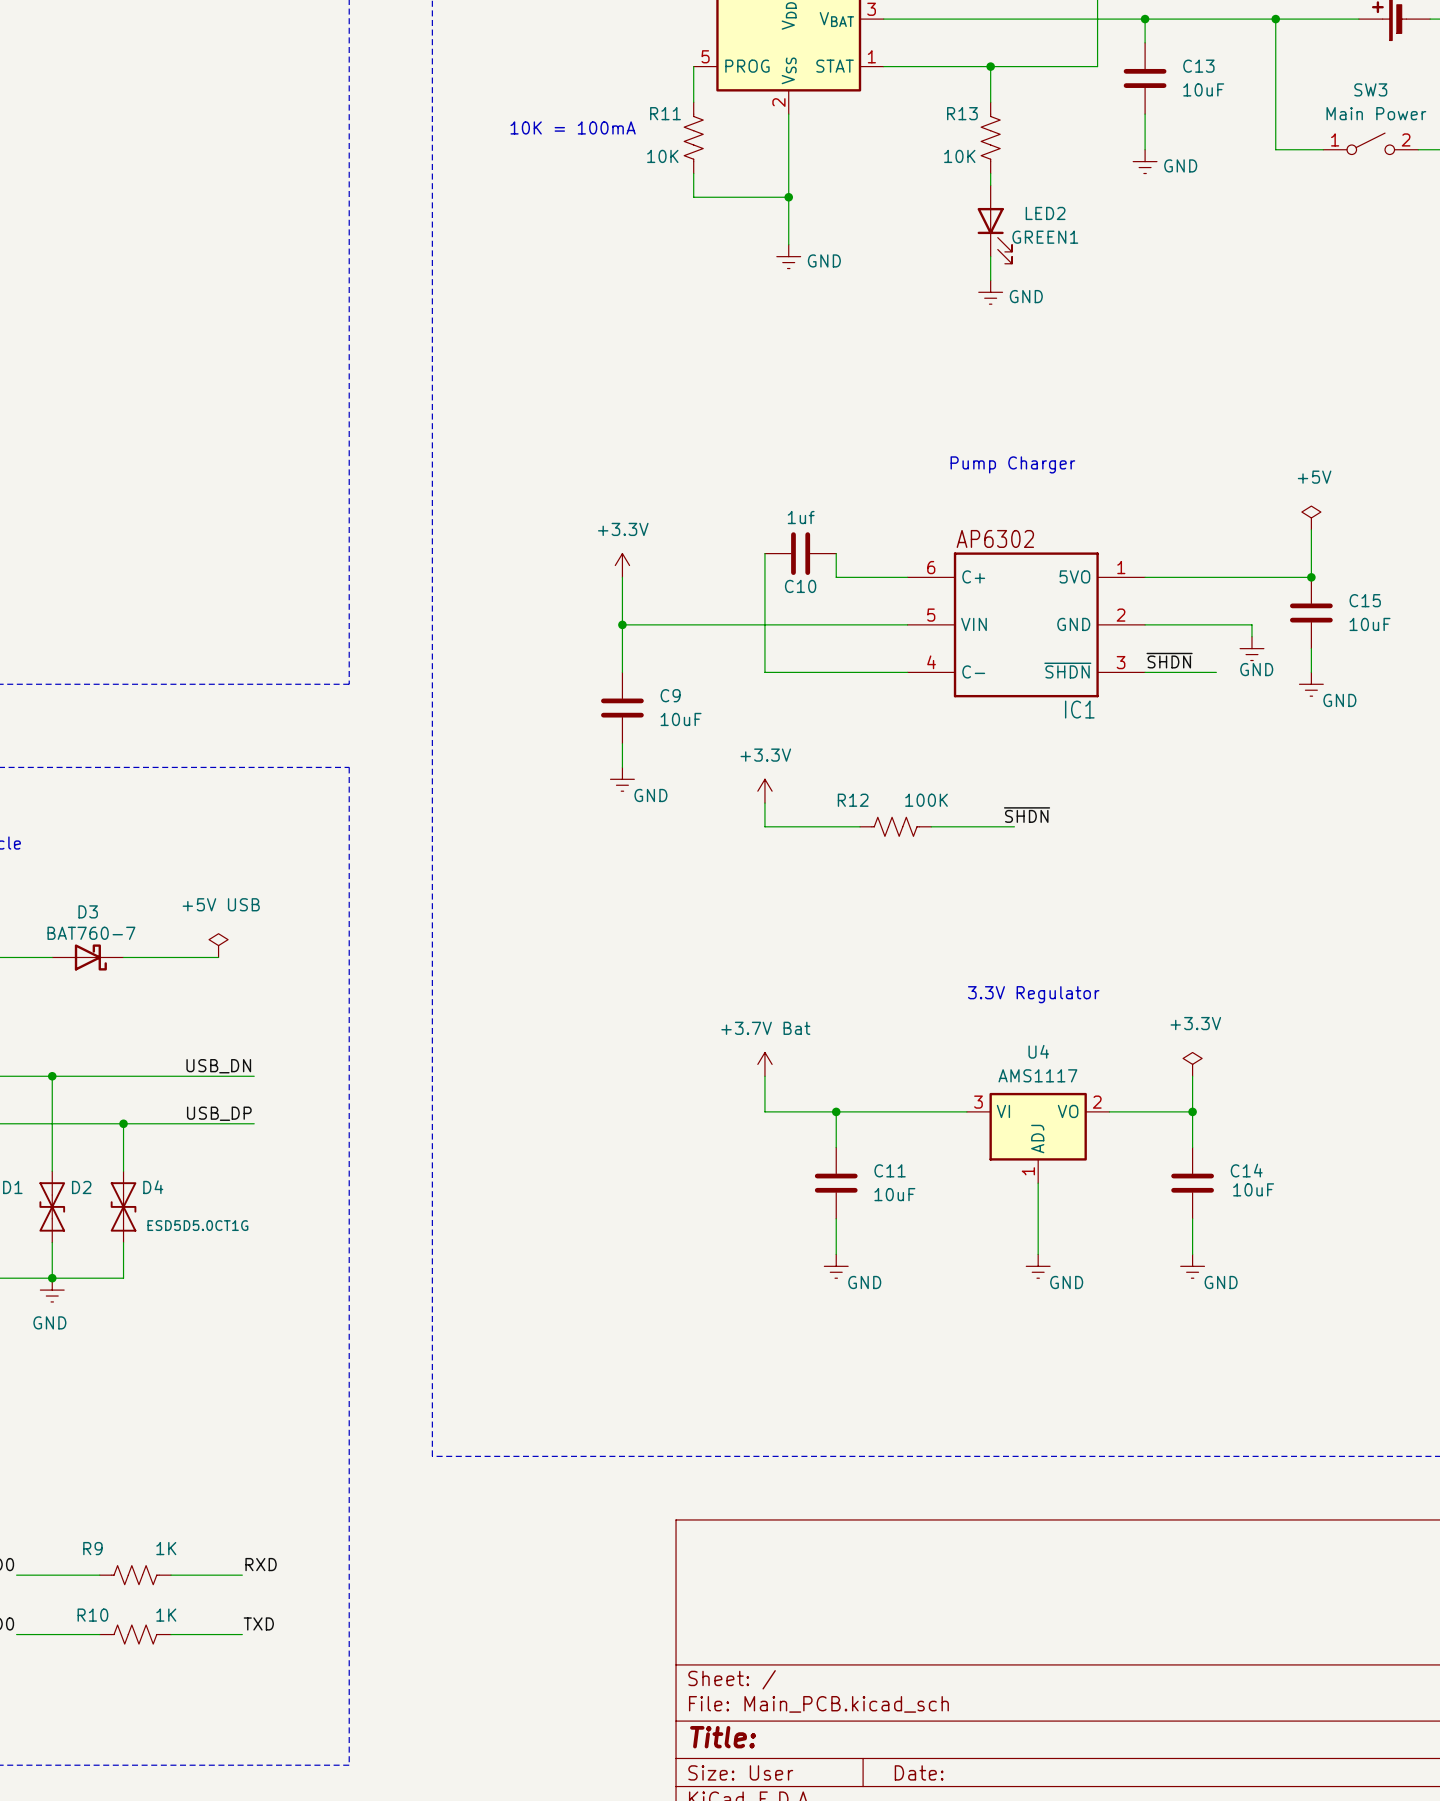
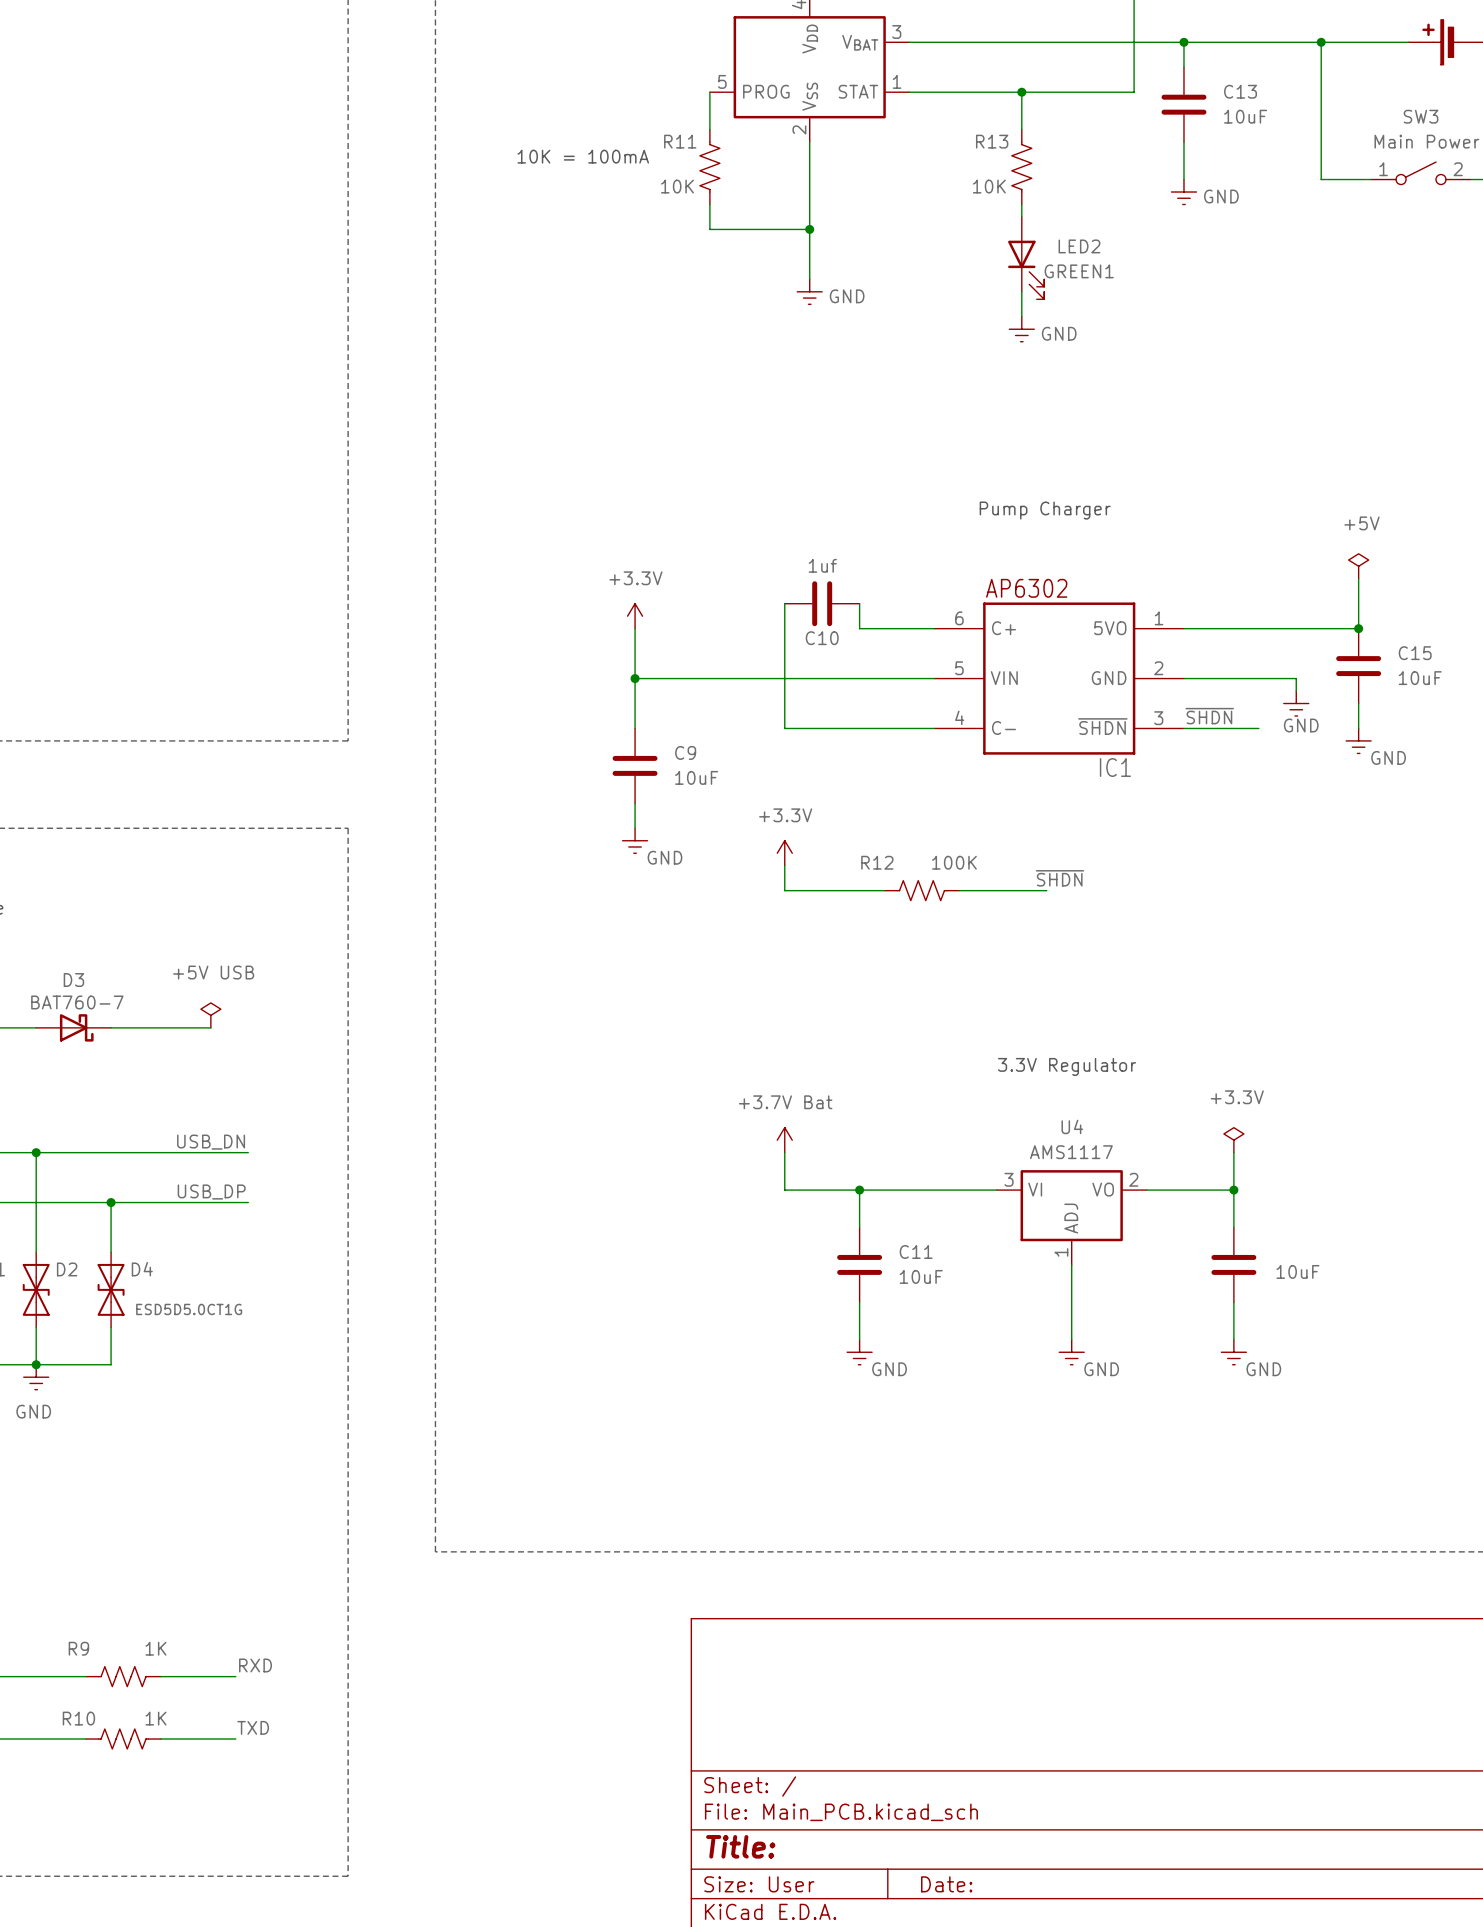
C14 name: C14 (1246, 1170) -> none

